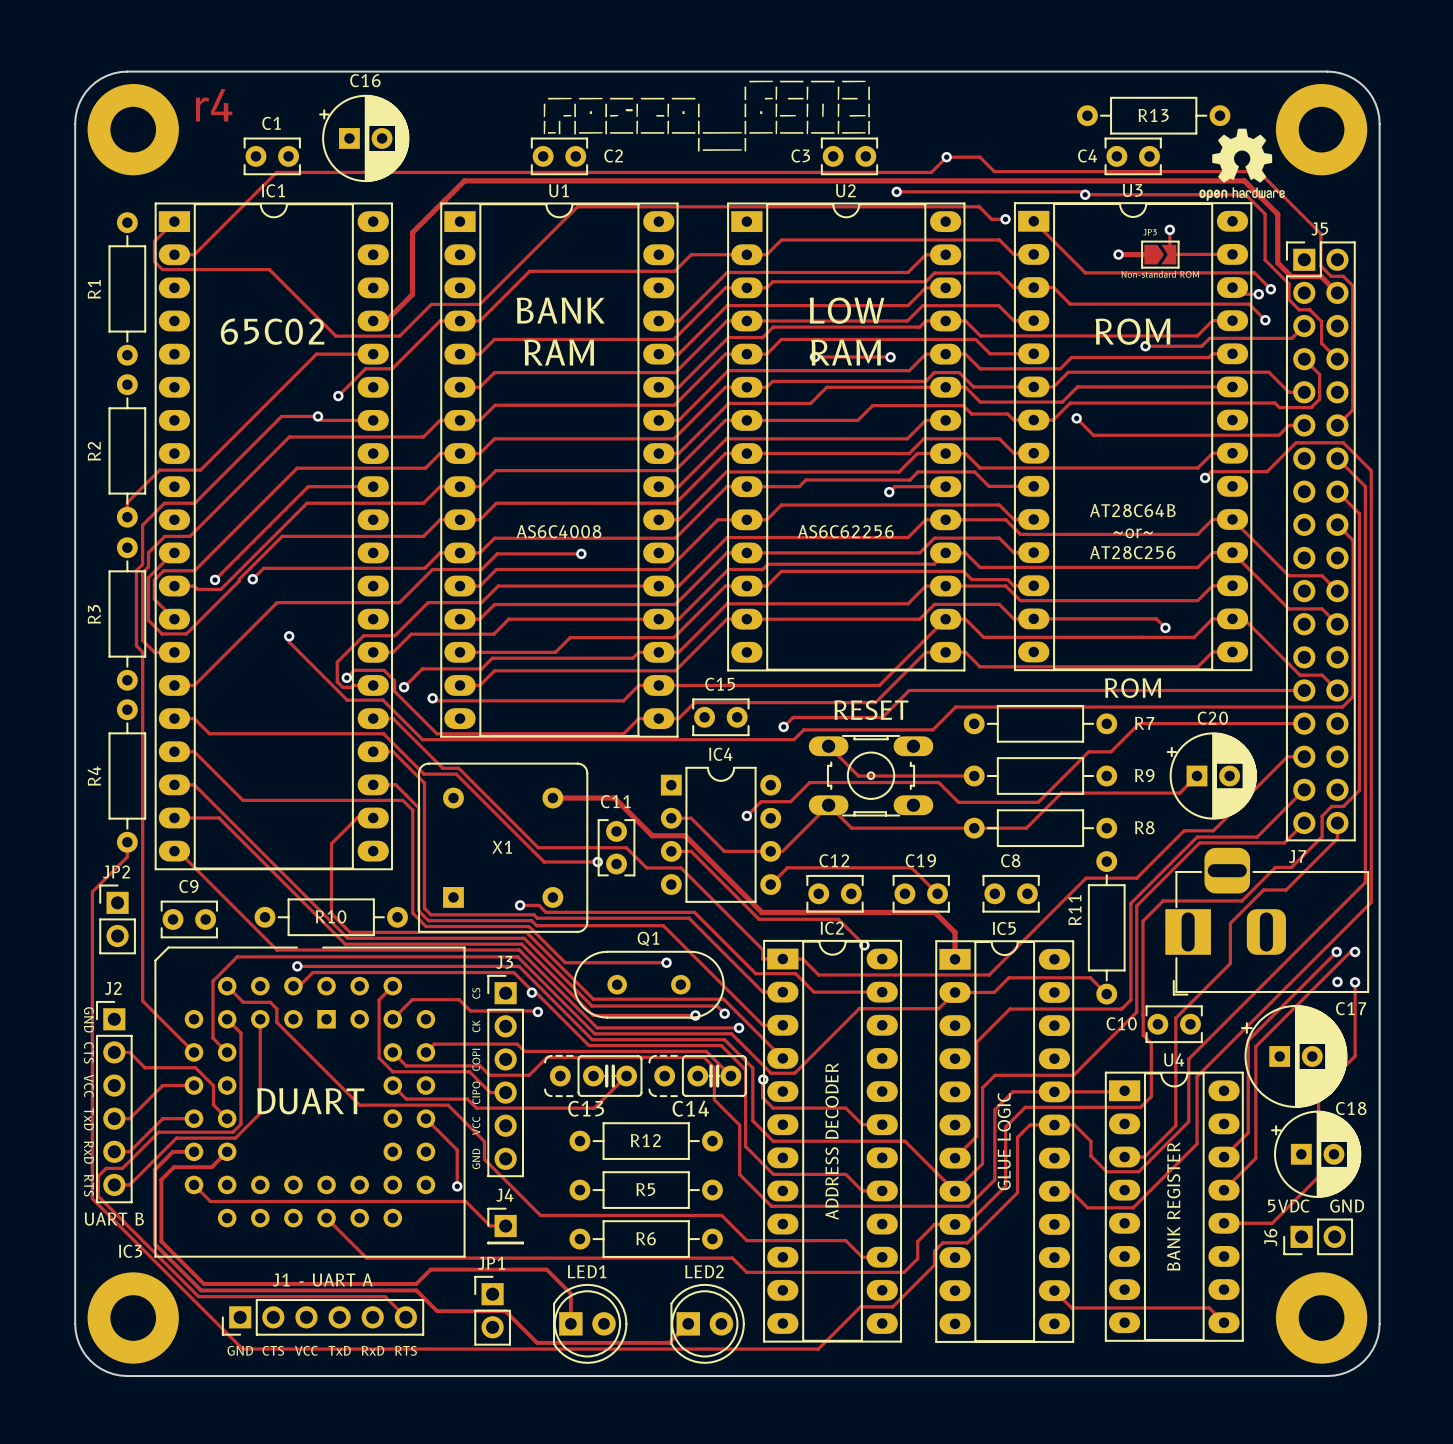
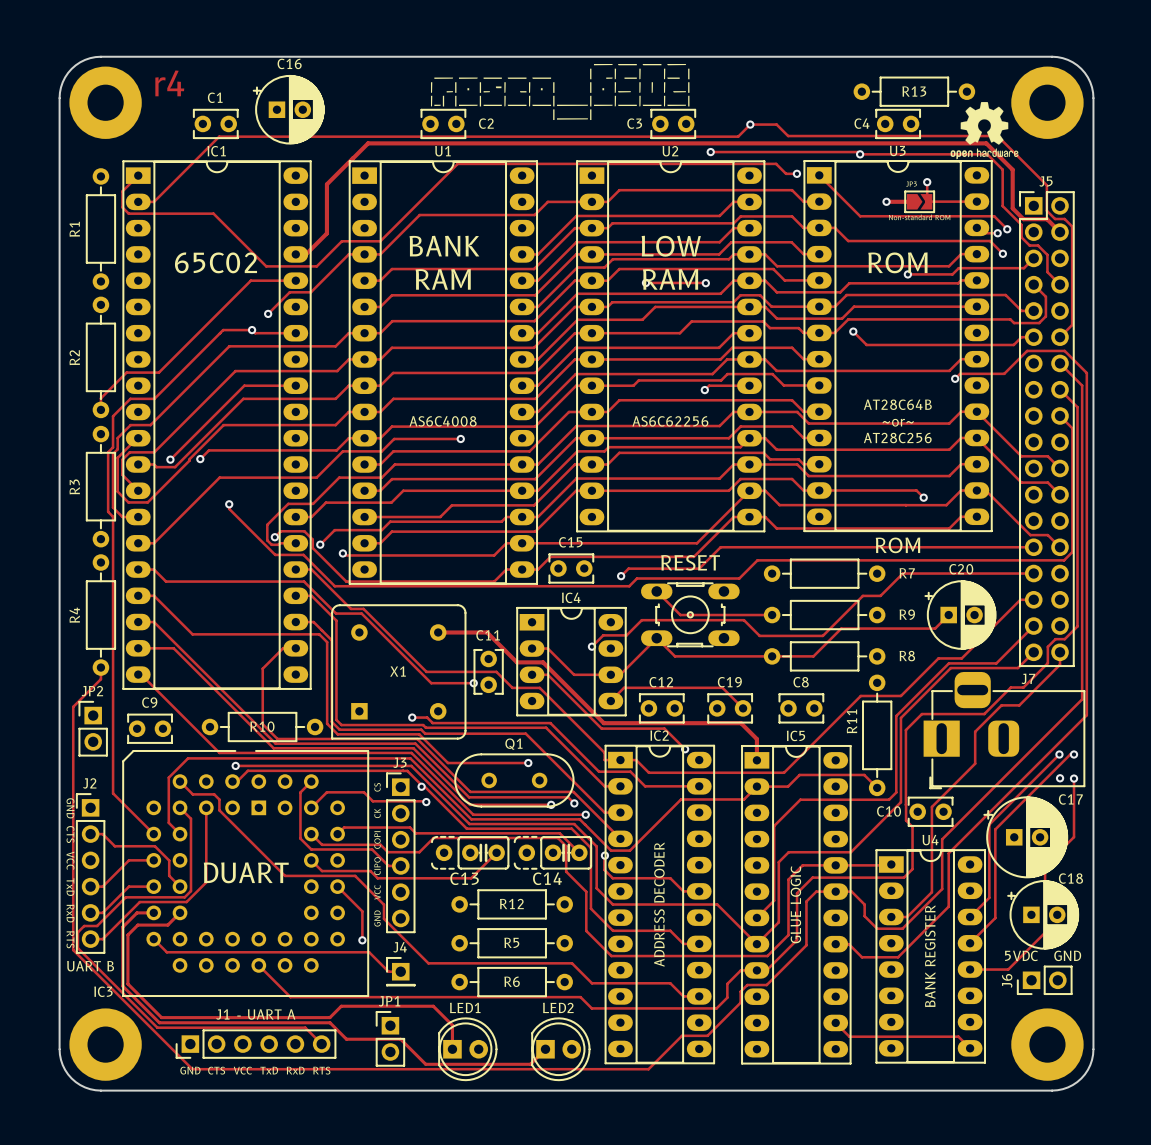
IC4 footprint: [660, 766, 782, 903] -> [516, 607, 627, 717]

